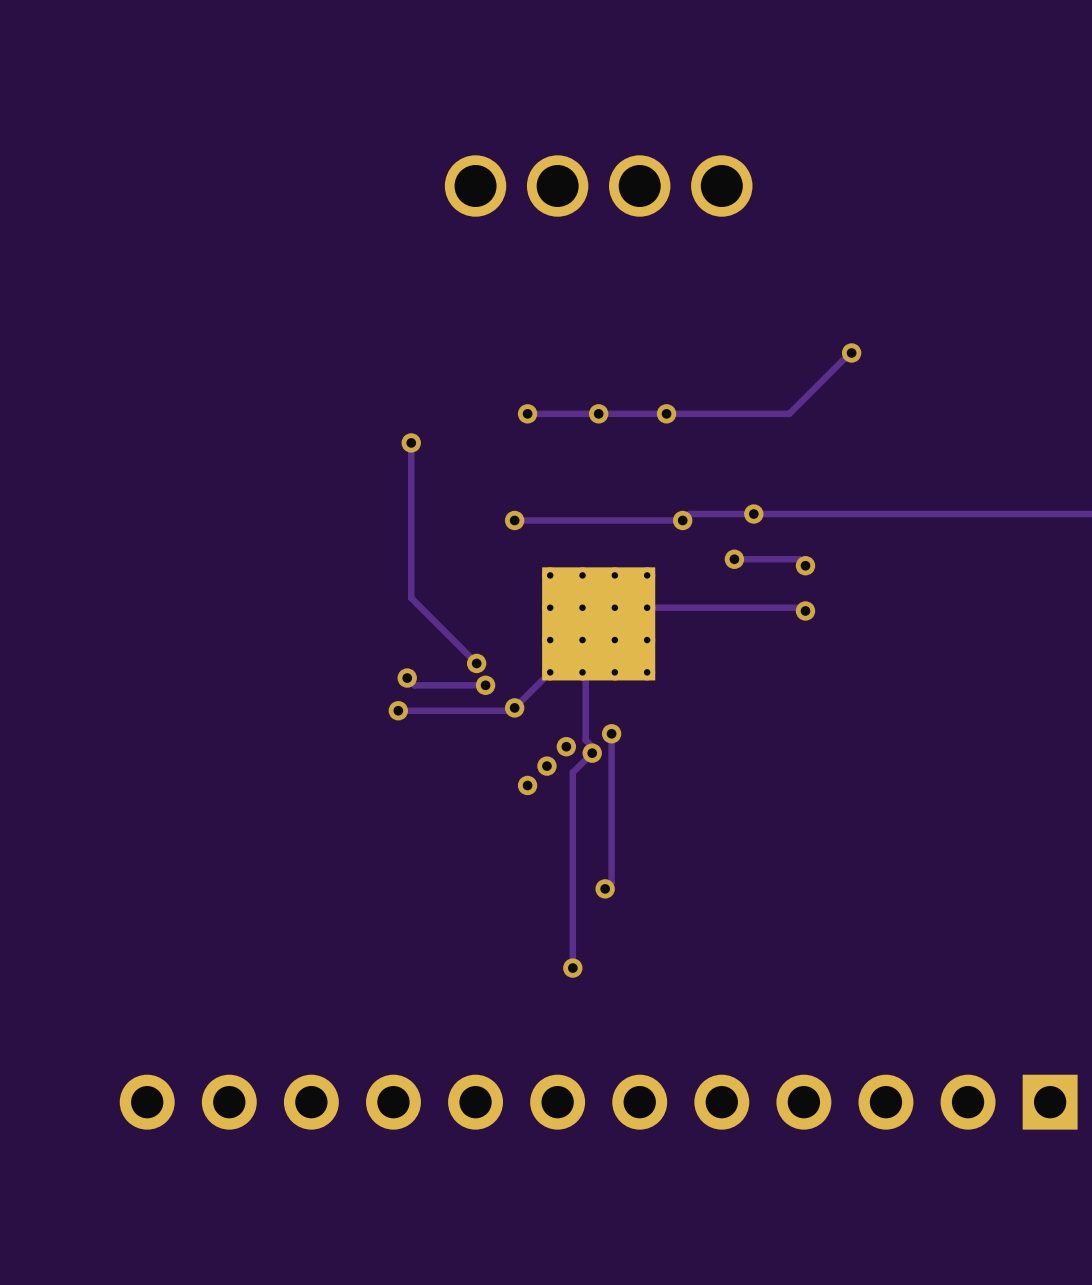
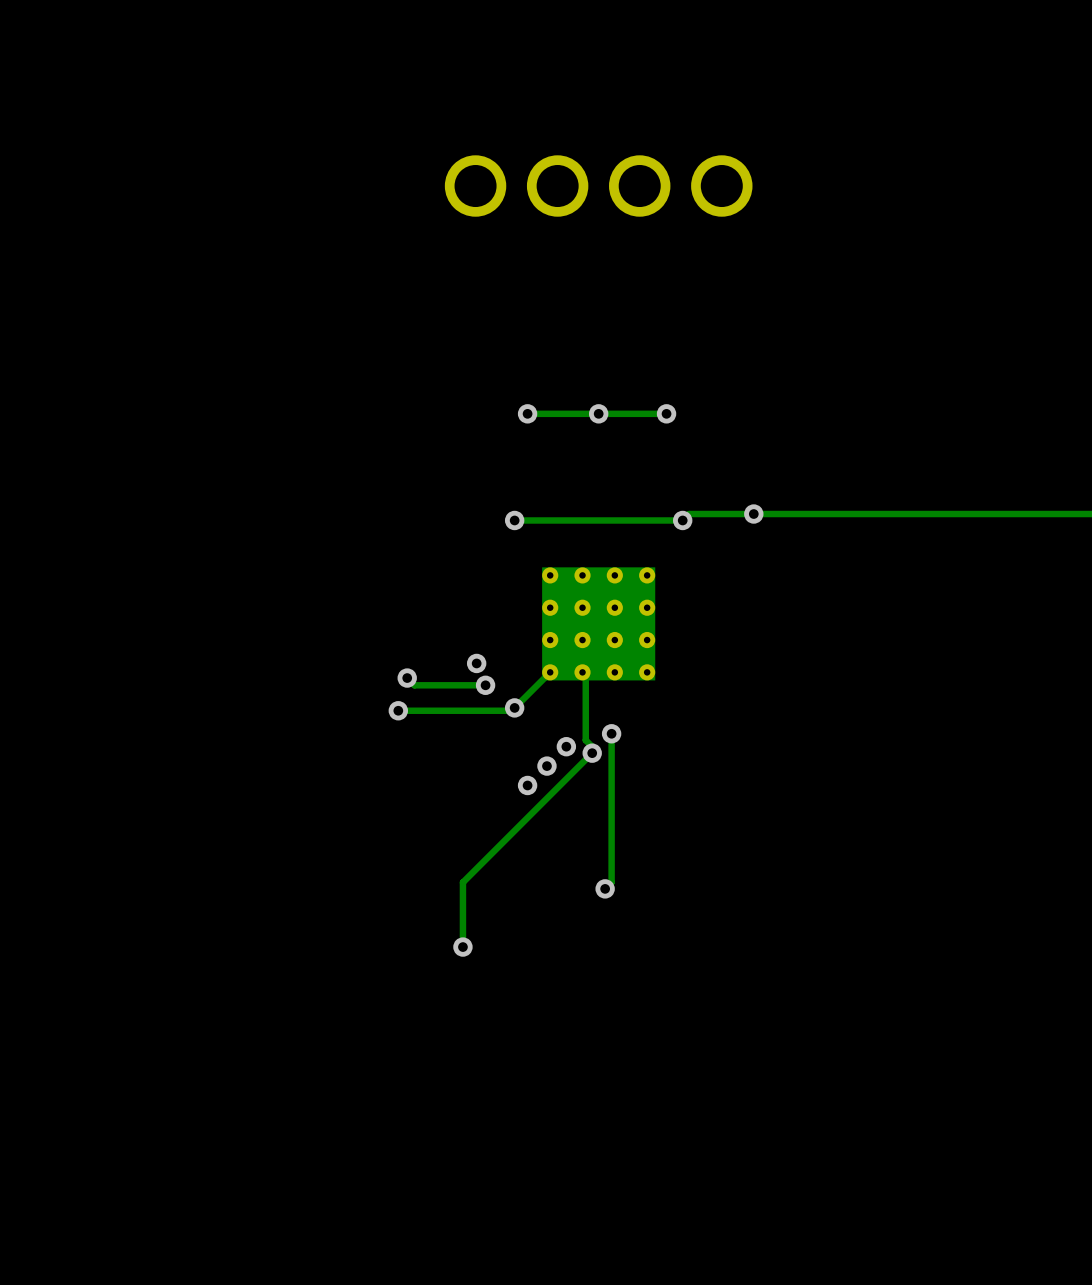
track: (850, 352) (789, 413) (666, 413) -> none
via: (851, 352) -> none
track: (411, 442) (411, 598) (476, 663) -> none
via: (411, 442) -> none
track: (734, 559) (799, 559) (805, 565) -> none
via: (734, 559) -> none
via: (805, 565) -> none
track: (647, 607) (802, 607) (805, 610) -> none
via: (805, 610) -> none
track: (572, 772) (572, 968) -> (572, 772) (462, 882) (462, 947)
via position: (572, 968) -> (462, 947)
part: (598, 1102) -> none

